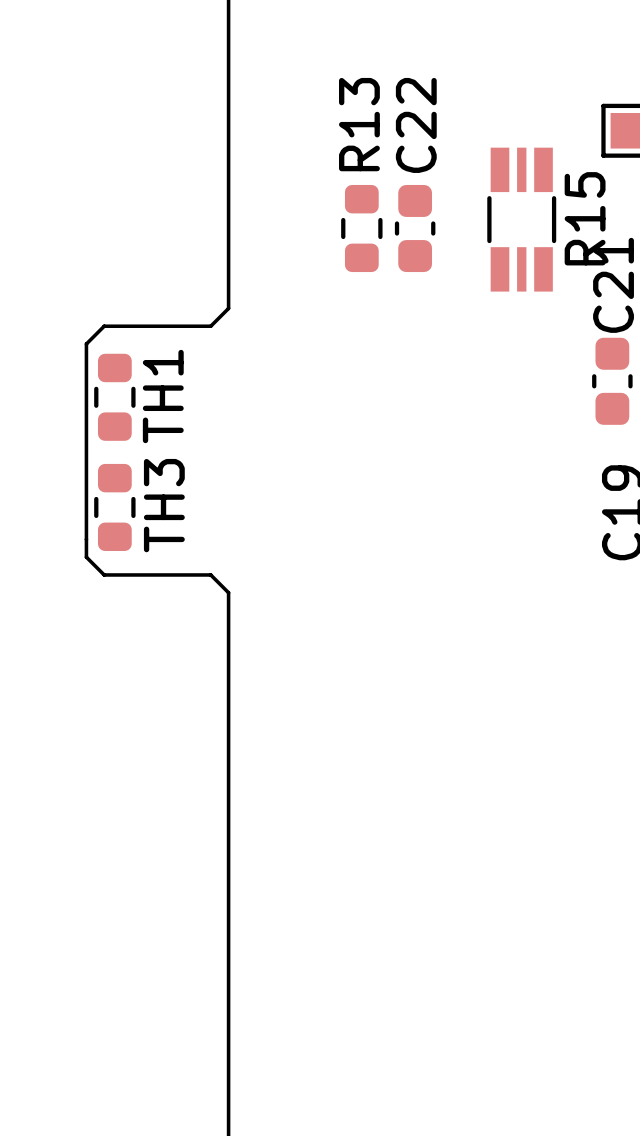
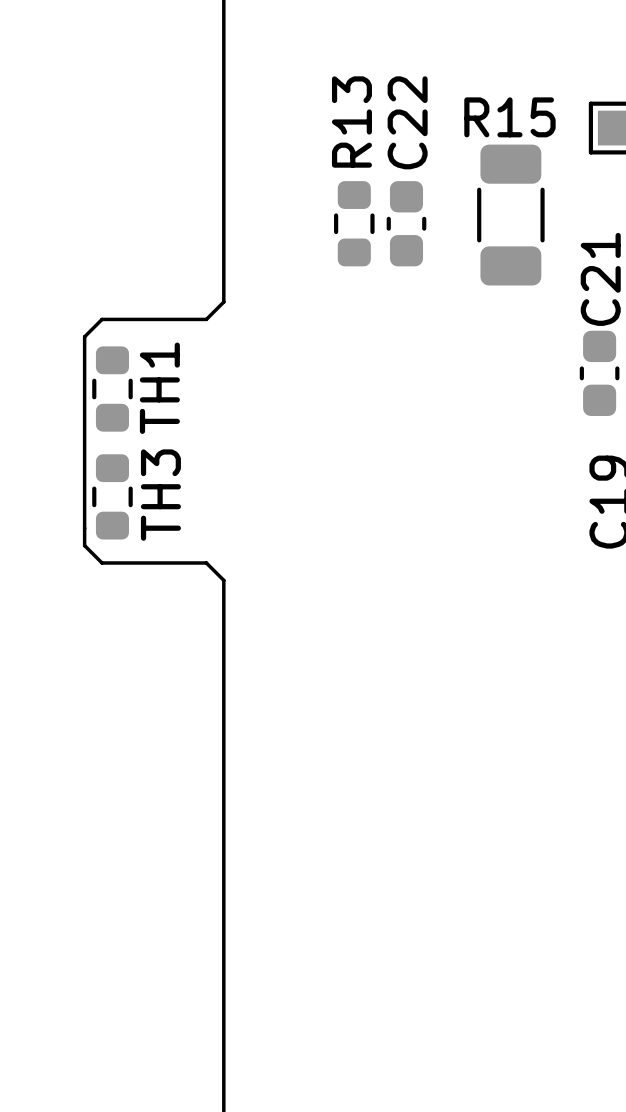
R15 footprint: [487, 147, 557, 292] -> [477, 144, 545, 286]
R15 name rotation: 0° (585, 218) -> 90° clockwise (509, 117)

